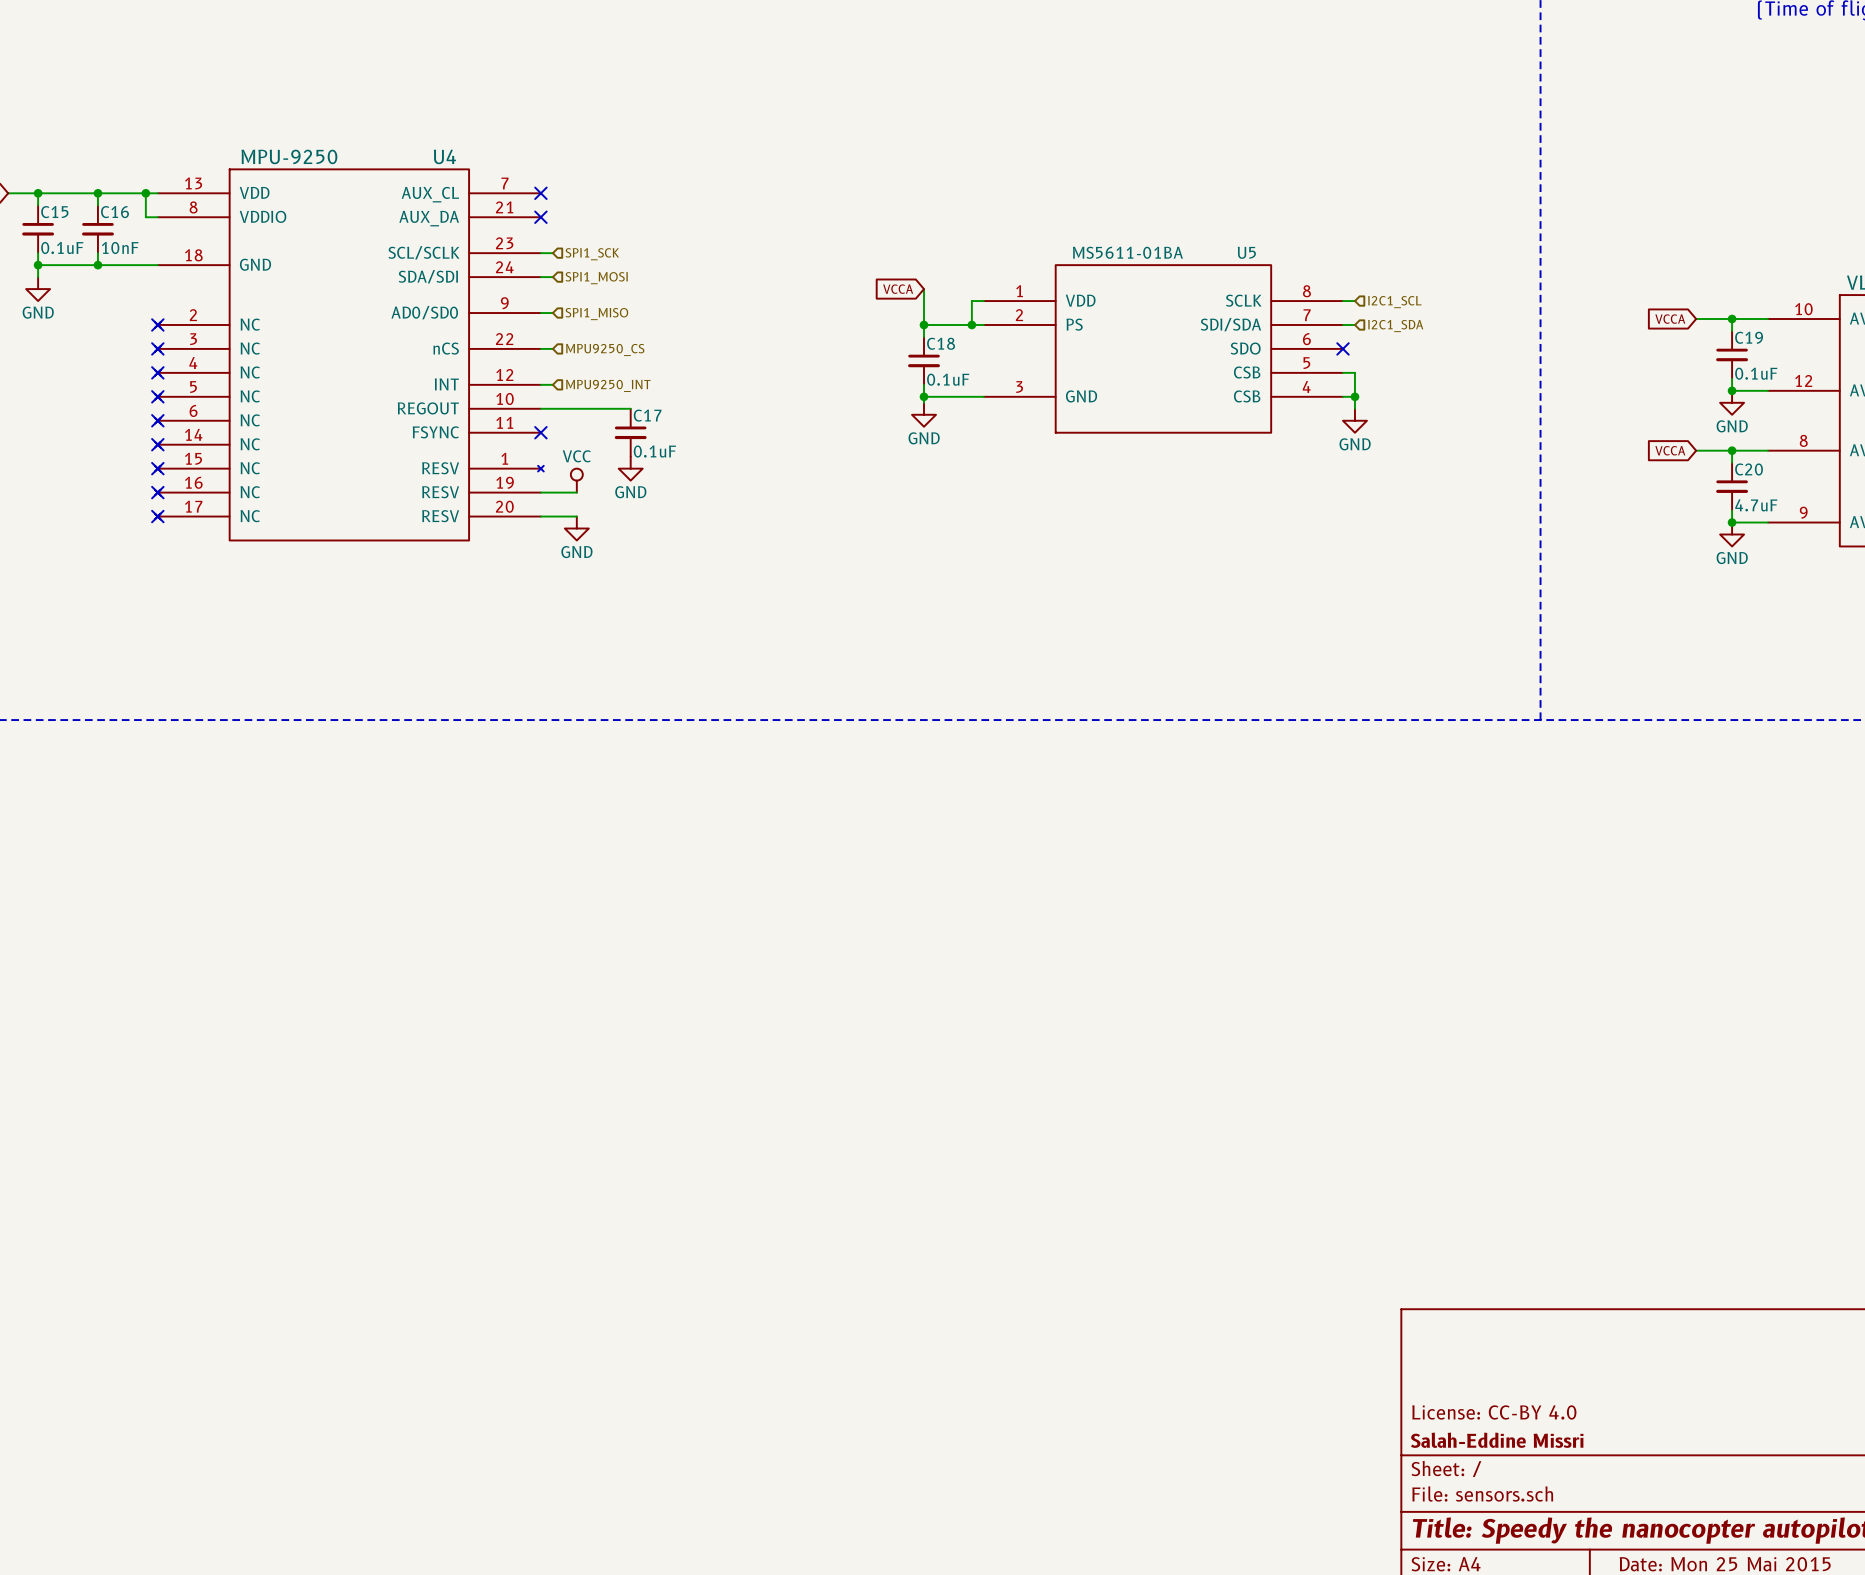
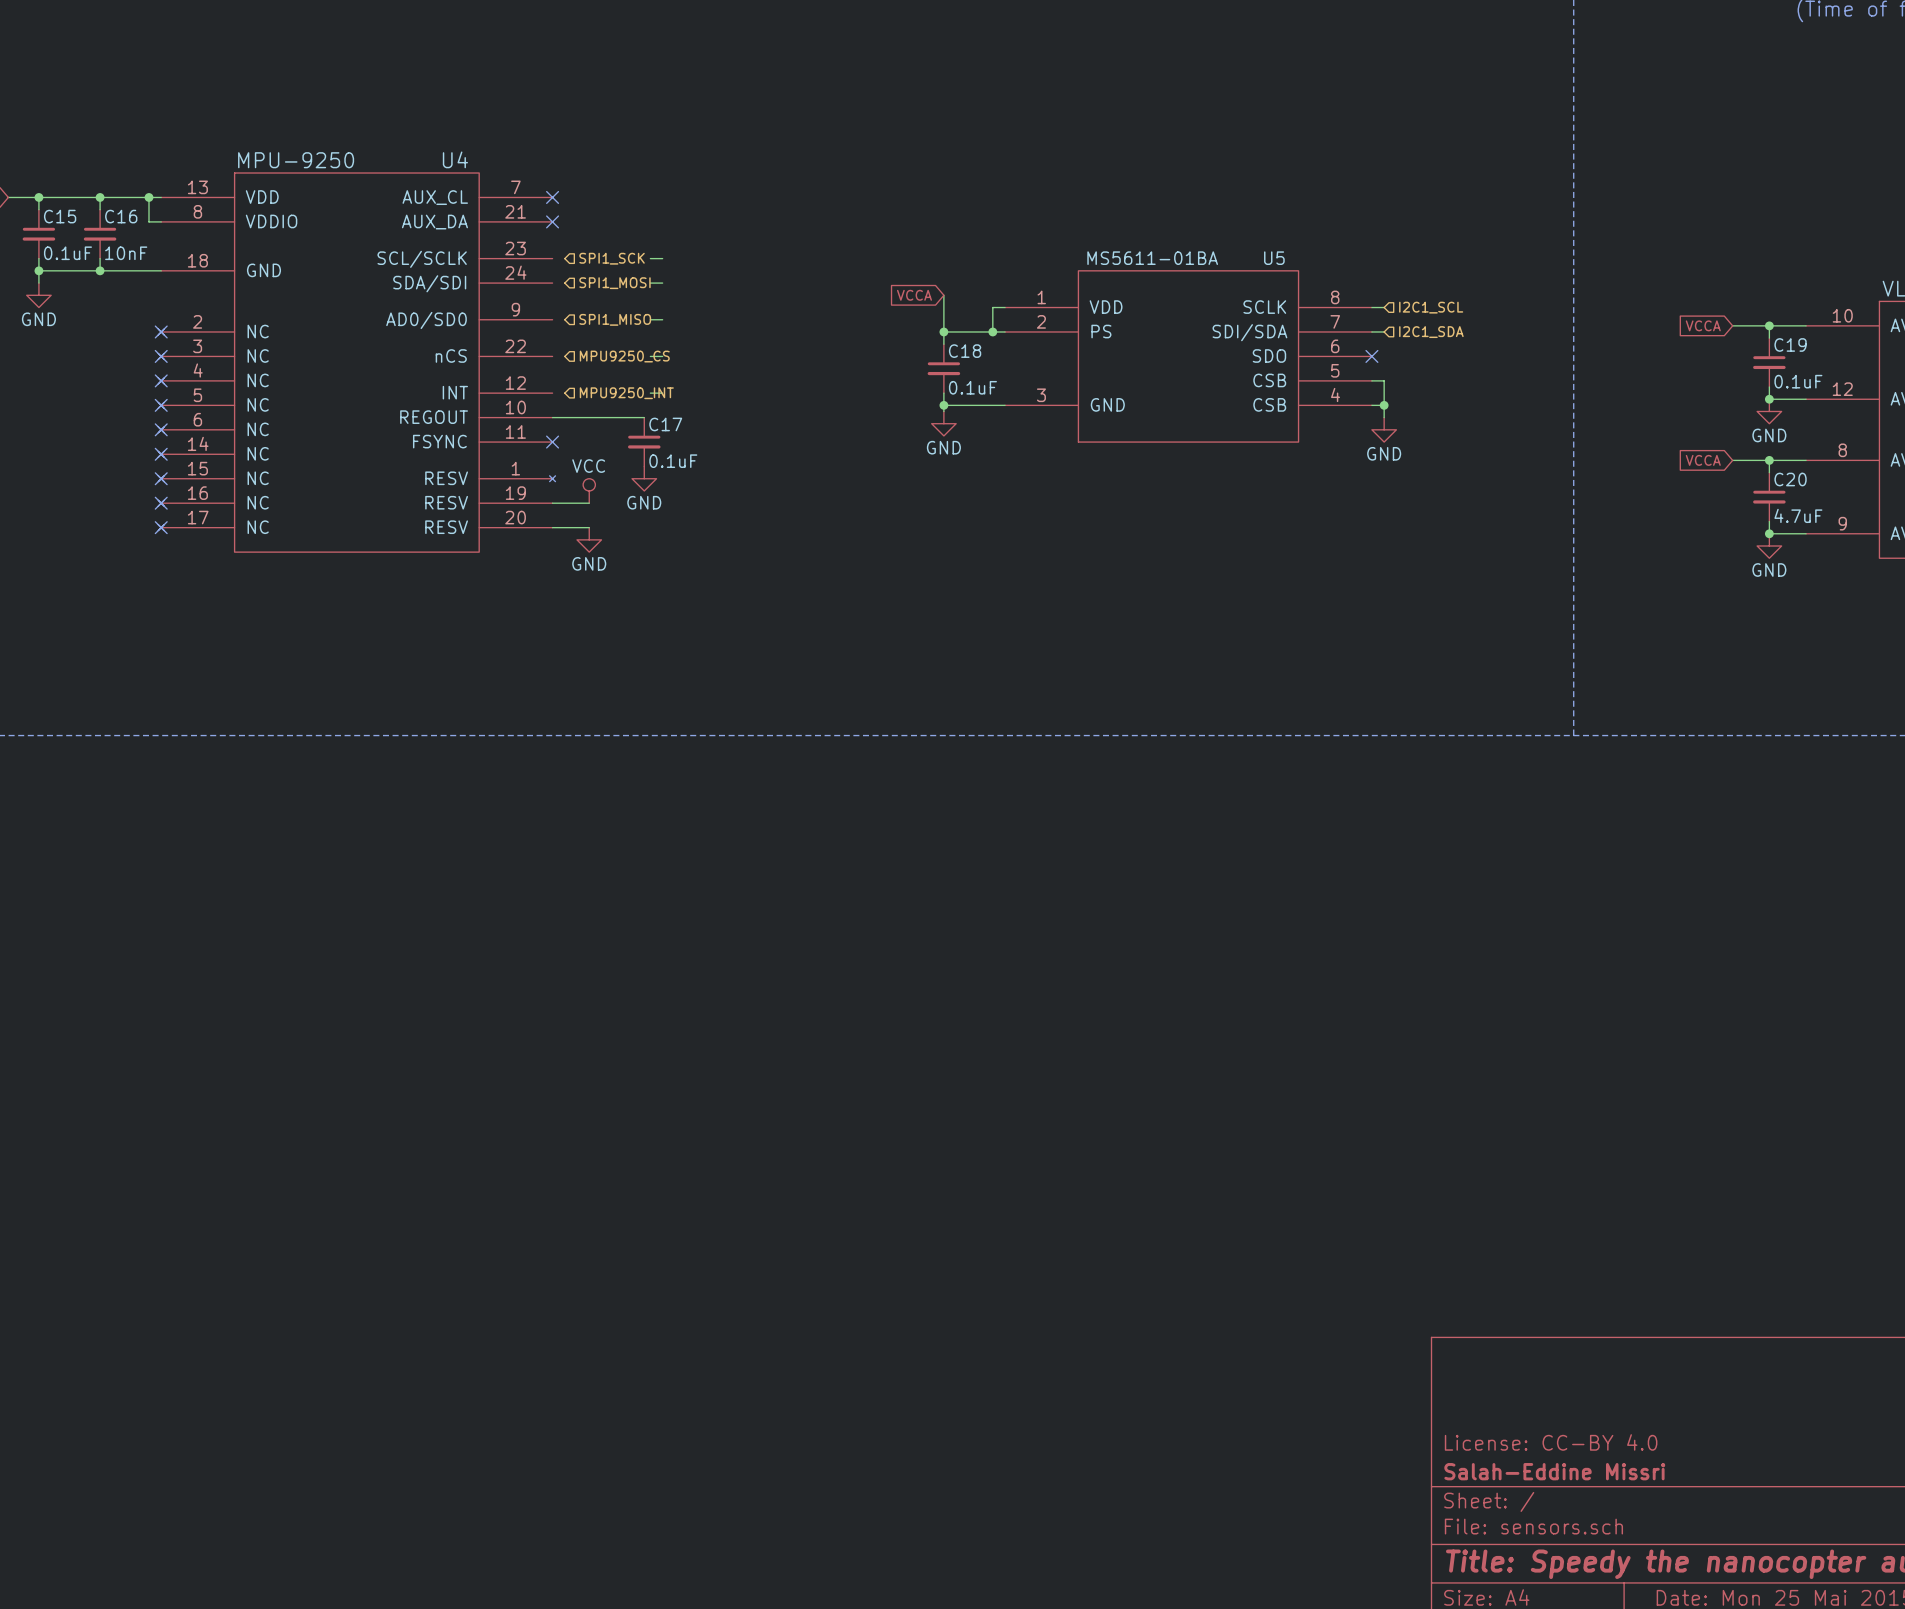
wire: (540, 253) (552, 253) -> (650, 258) (662, 258)
wire: (540, 277) (552, 277) -> (650, 283) (662, 283)
wire: (540, 313) (552, 313) -> (650, 319) (662, 319)
wire: (540, 348) (552, 348) -> (650, 356) (662, 356)
wire: (540, 384) (552, 384) -> (650, 393) (662, 393)

